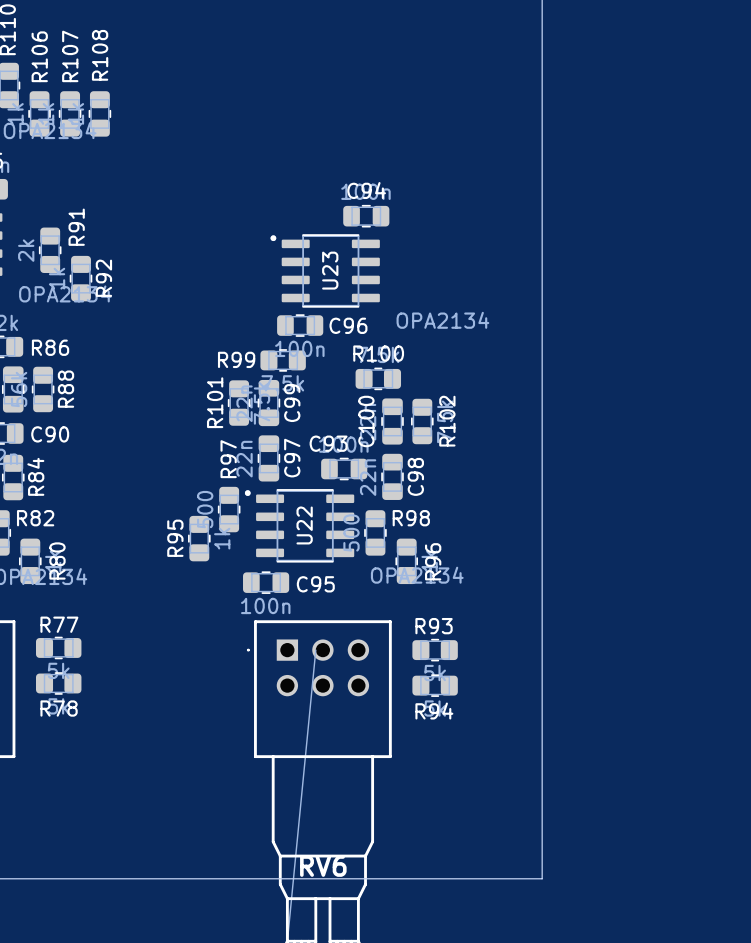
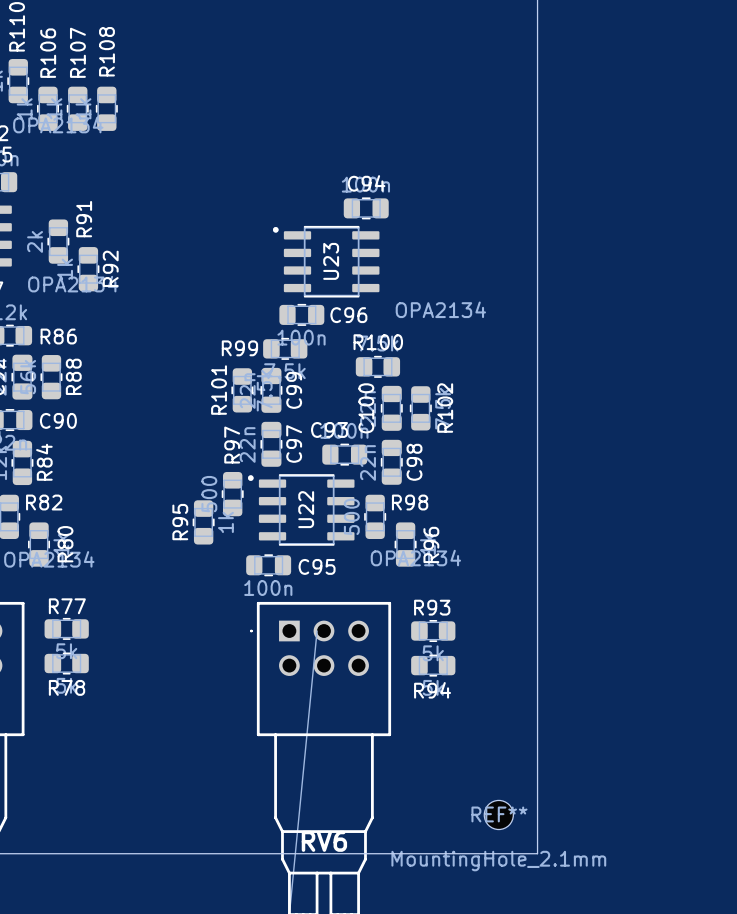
REF**: none -> MountingHole_2.1mm (498, 814)

